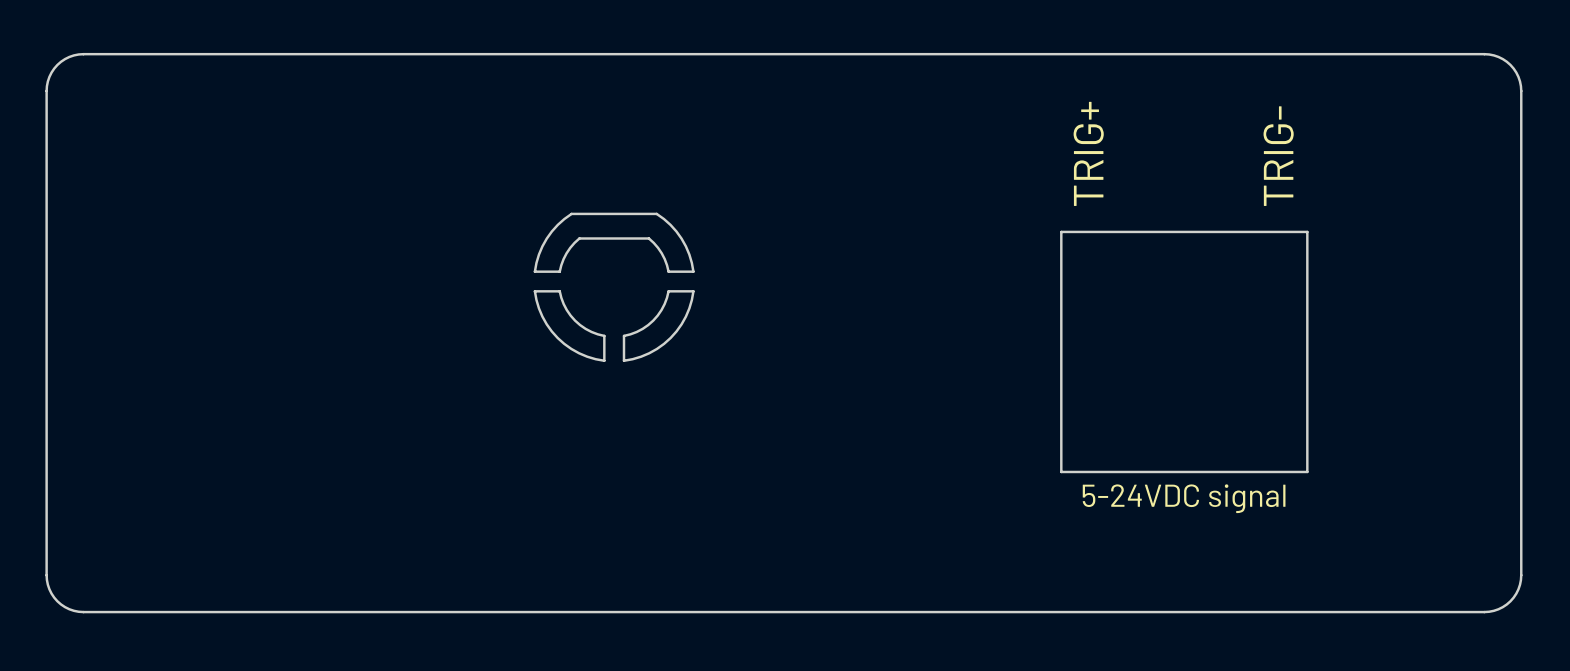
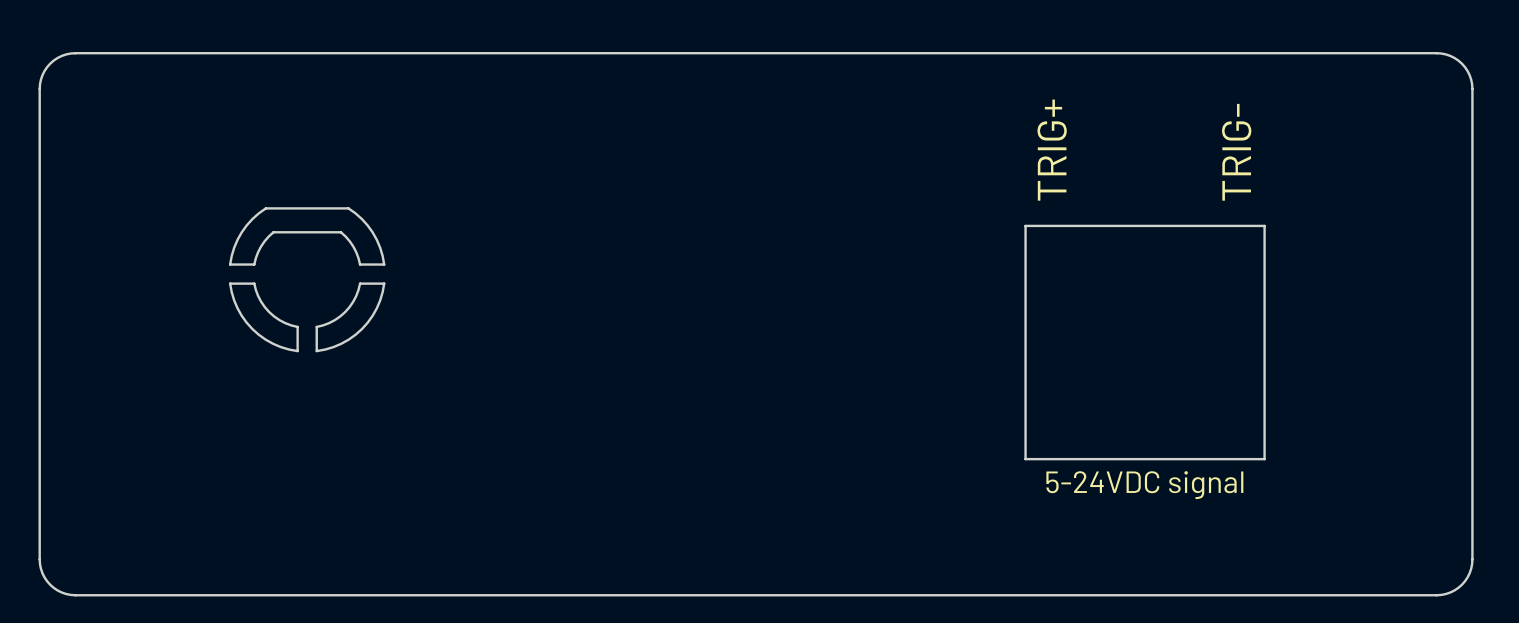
board edge: (571, 213) (656, 213) (670, 224) (681, 238) (689, 254) (693, 271) (668, 271) (661, 253) (648, 238) (579, 238) (566, 253) (559, 271) (534, 271) (538, 254) (546, 238) (557, 224) (571, 213) -> (265, 208) (348, 208) (361, 219) (372, 232) (380, 247) (384, 264) (360, 264) (353, 246) (340, 232) (273, 232) (260, 246) (254, 264) (230, 264) (234, 247) (241, 232) (252, 219) (265, 208)
board edge: (534, 291) (559, 291) (566, 310) (575, 320) (591, 331) (604, 335) (604, 360) (579, 353) (557, 337) (542, 316) (534, 291) -> (230, 283) (254, 283) (258, 296) (269, 312) (279, 320) (297, 326) (297, 351) (273, 343) (252, 328) (237, 308) (230, 283)
board edge: (668, 291) (693, 291) (689, 308) (681, 324) (670, 337) (656, 348) (641, 356) (623, 360) (623, 335) (642, 328) (653, 320) (664, 304) (668, 291) -> (360, 283) (384, 283) (380, 300) (372, 315) (362, 328) (348, 339) (333, 347) (316, 351) (316, 326) (334, 320) (345, 312) (356, 296) (360, 283)

